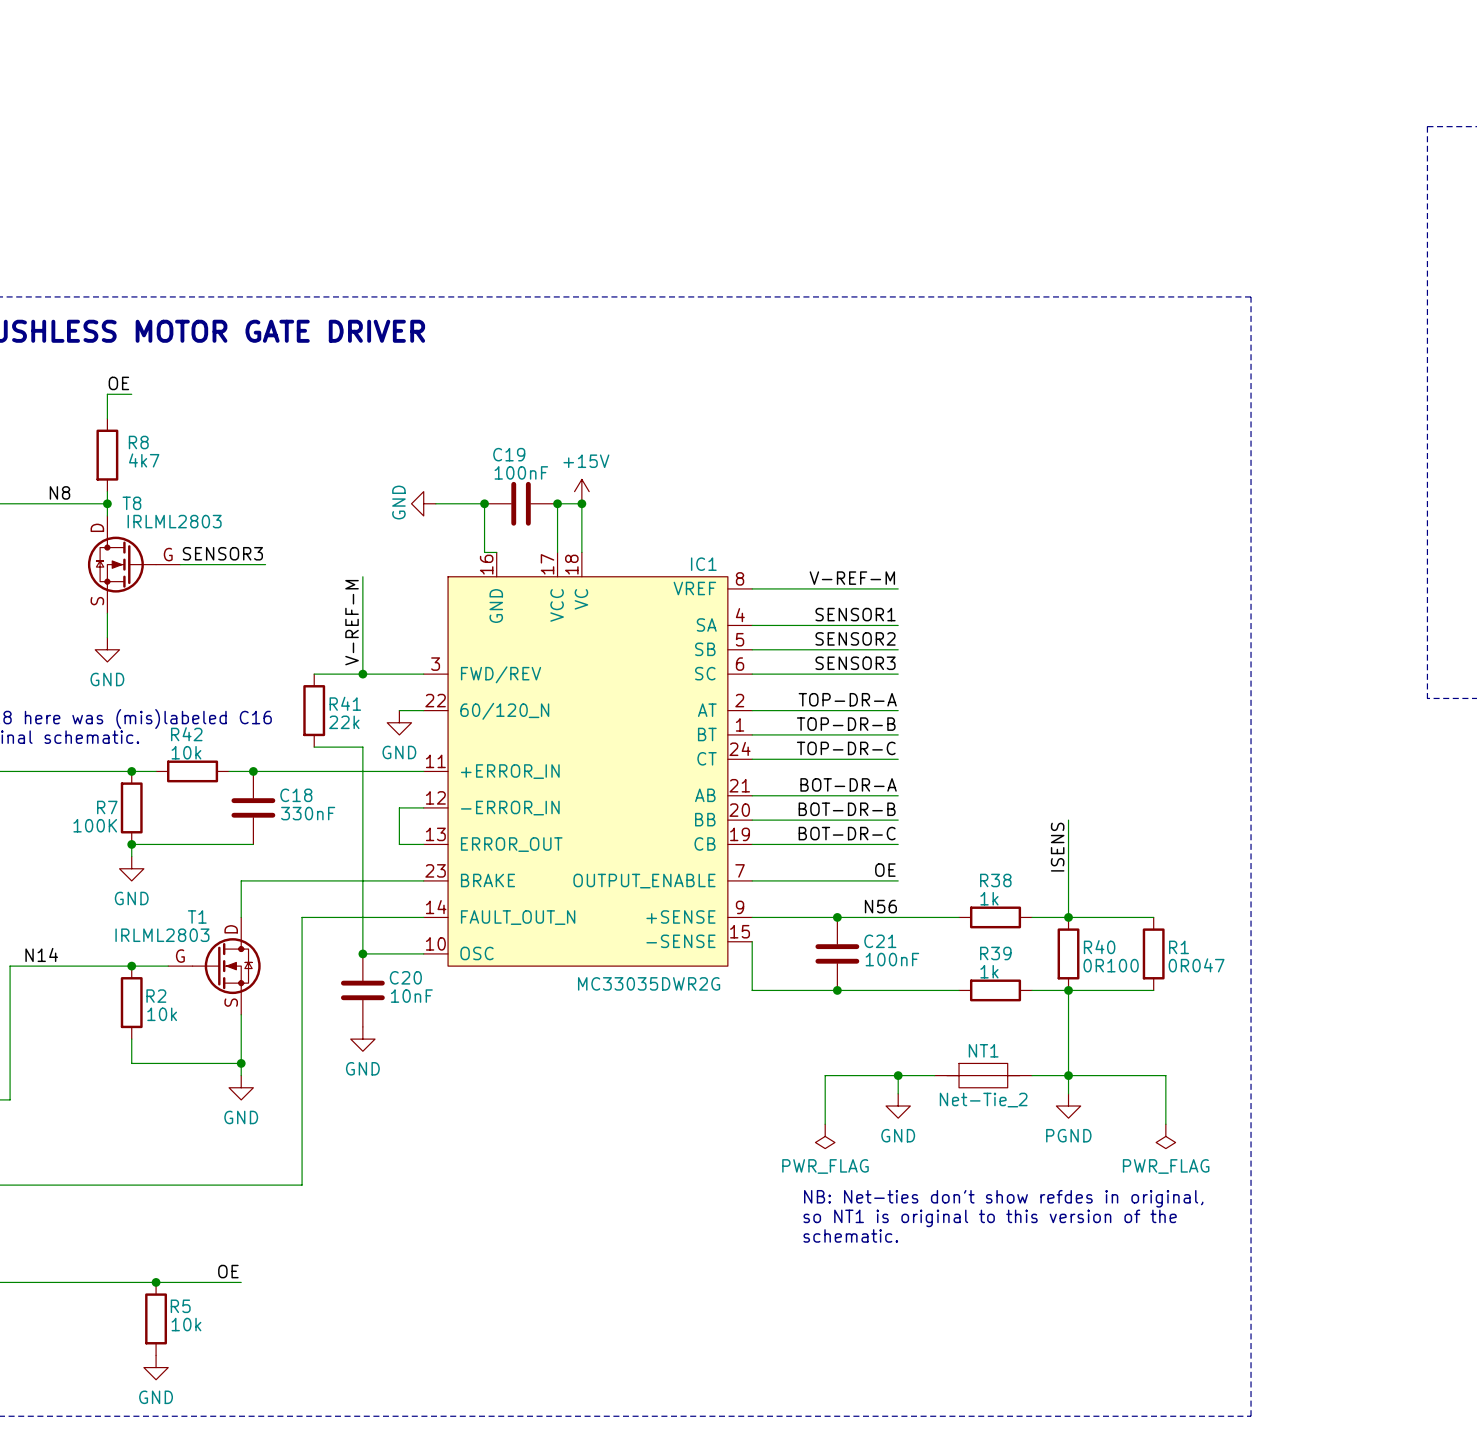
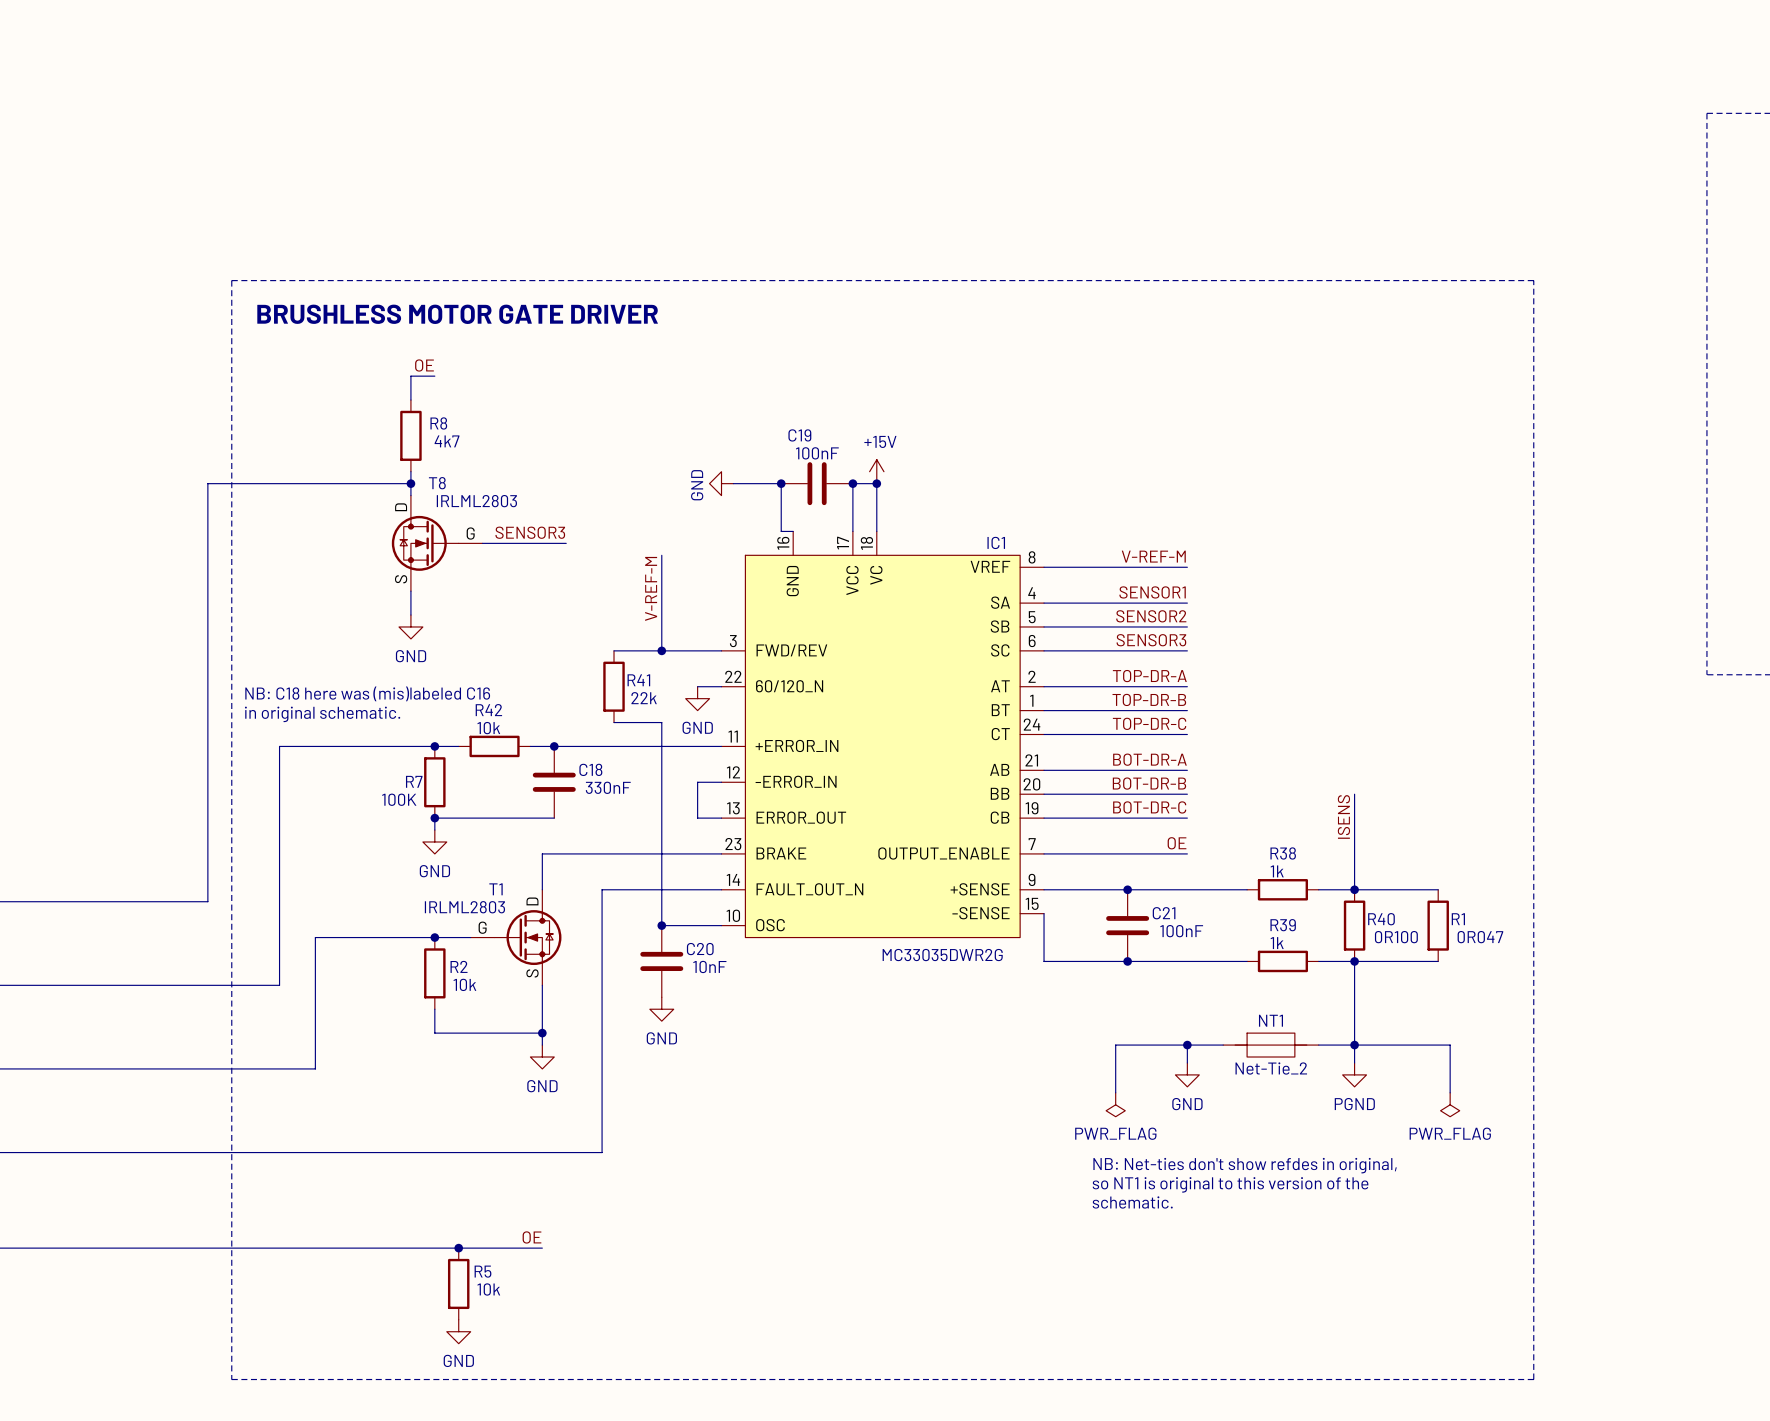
label: N8 (59, 492) -> none
label: N56 (880, 906) -> none
label: N14 (41, 954) -> none

